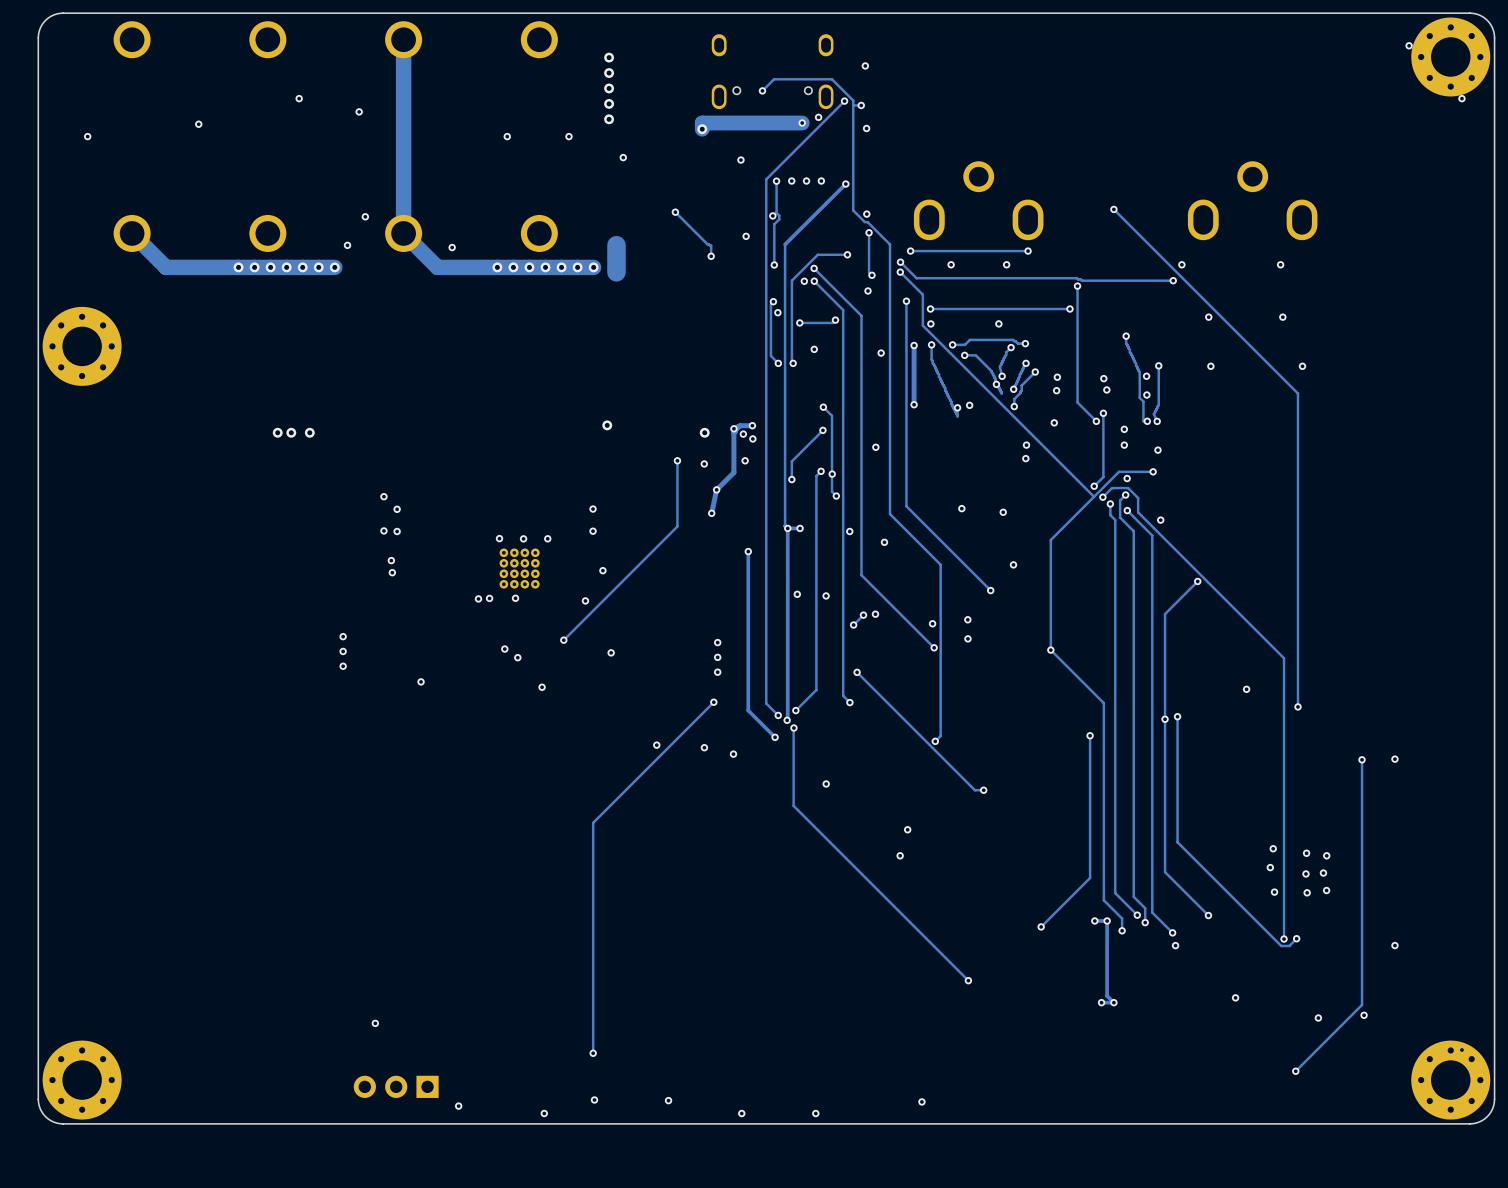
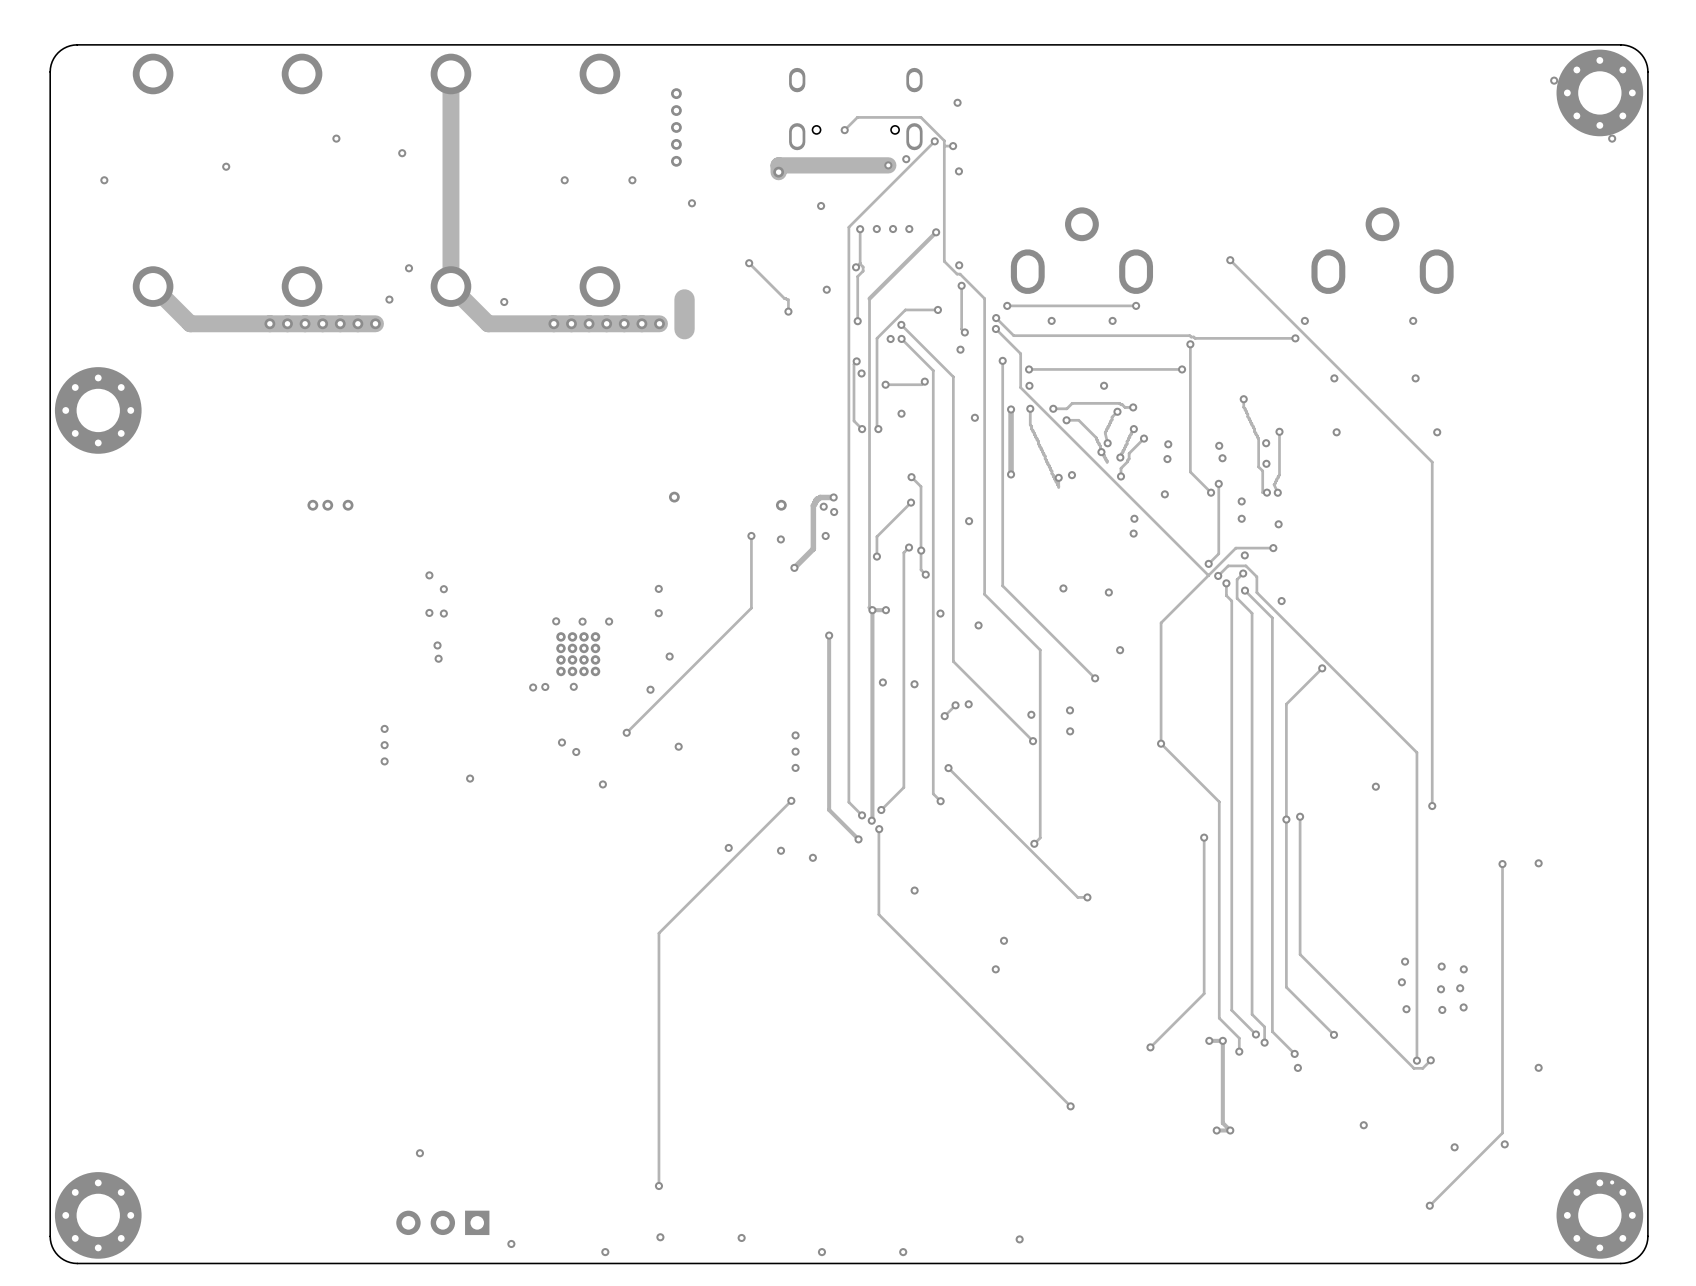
via: (733, 428) -> none
track: (716, 489) (711, 513) -> none
via: (711, 513) -> none

